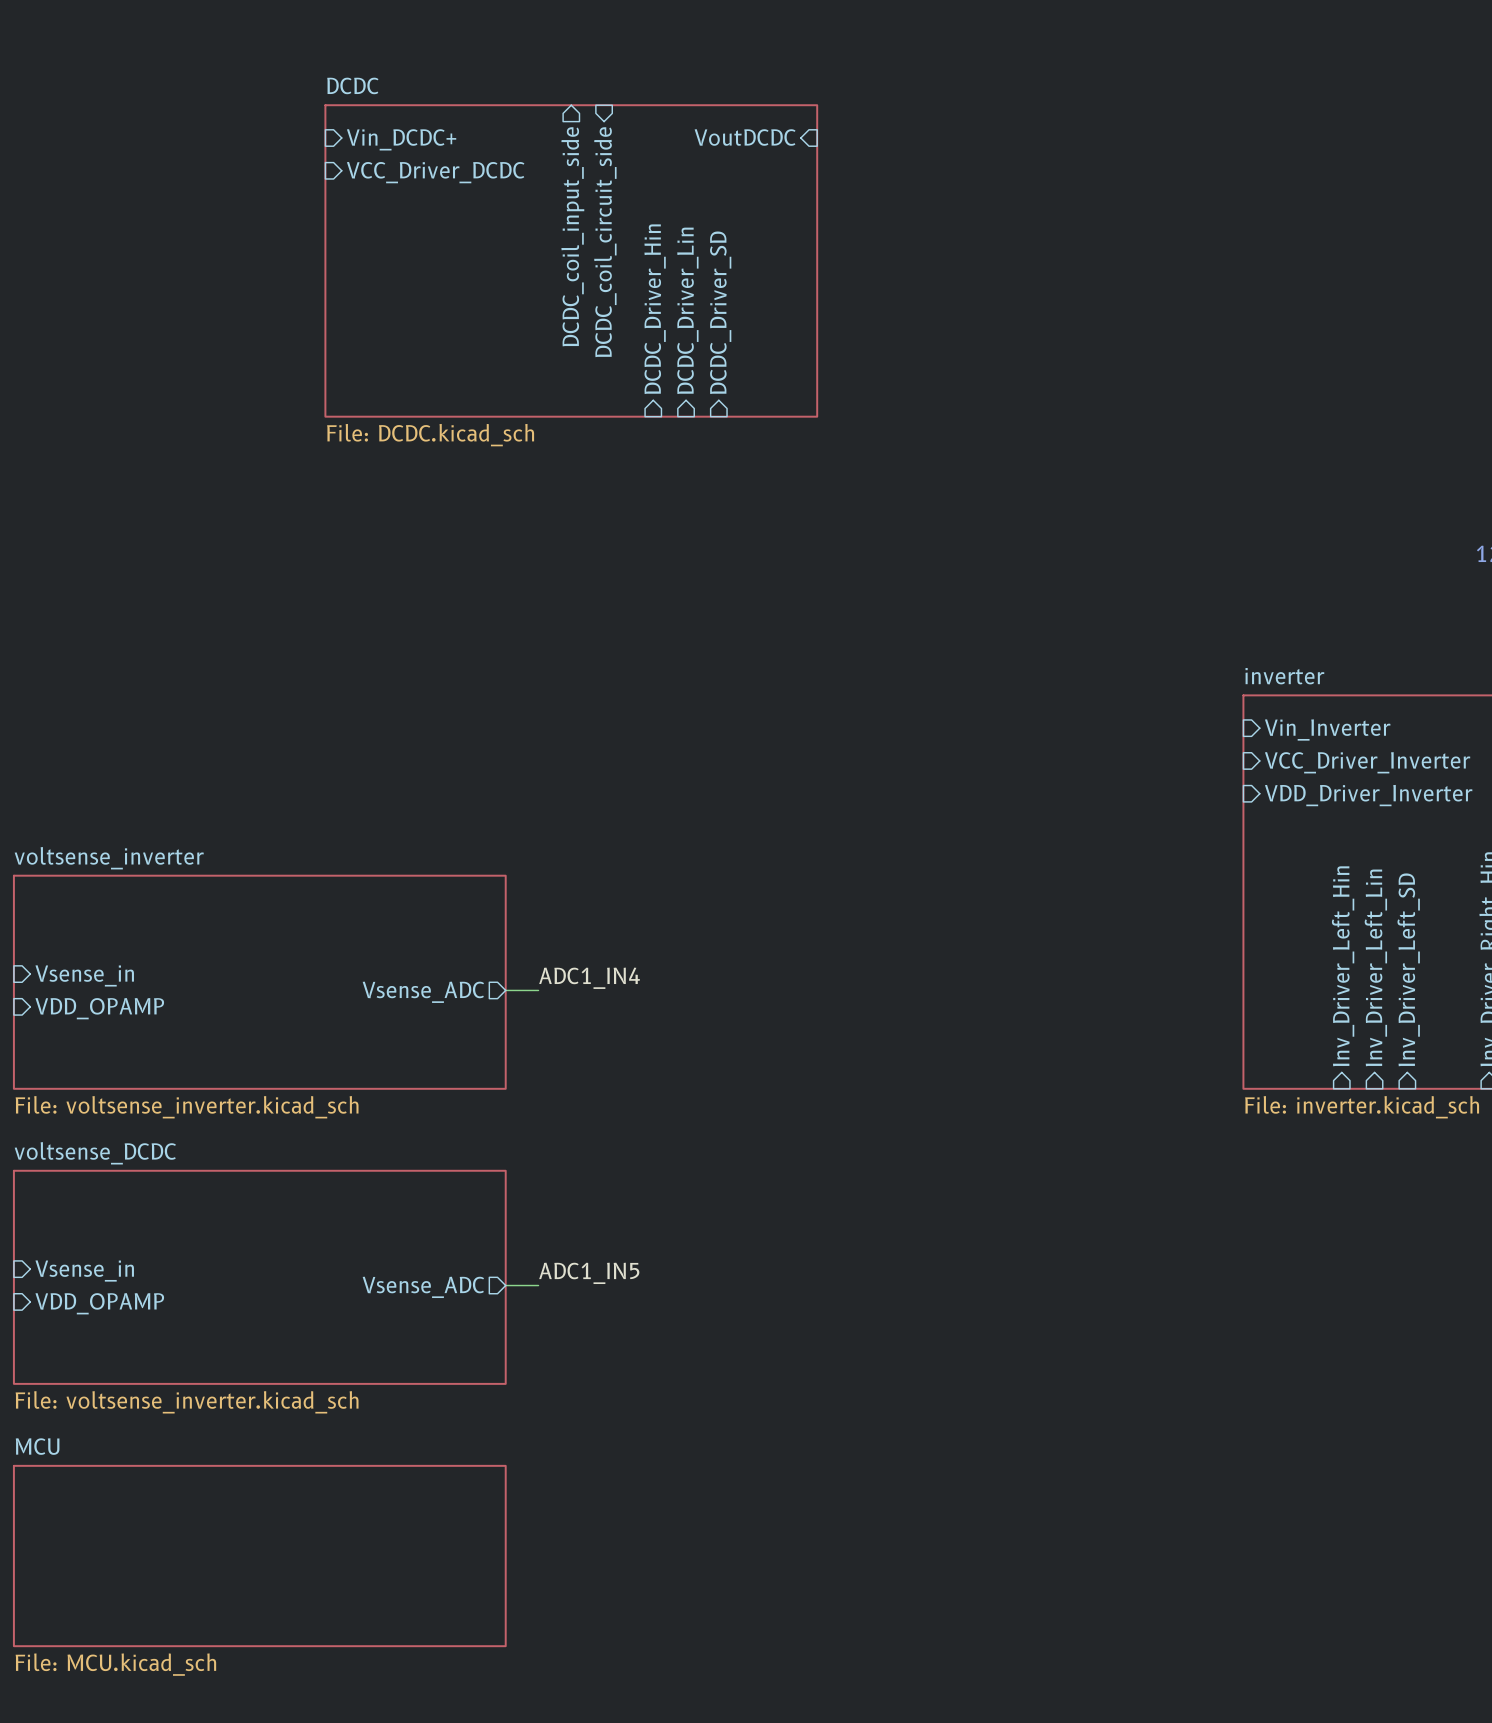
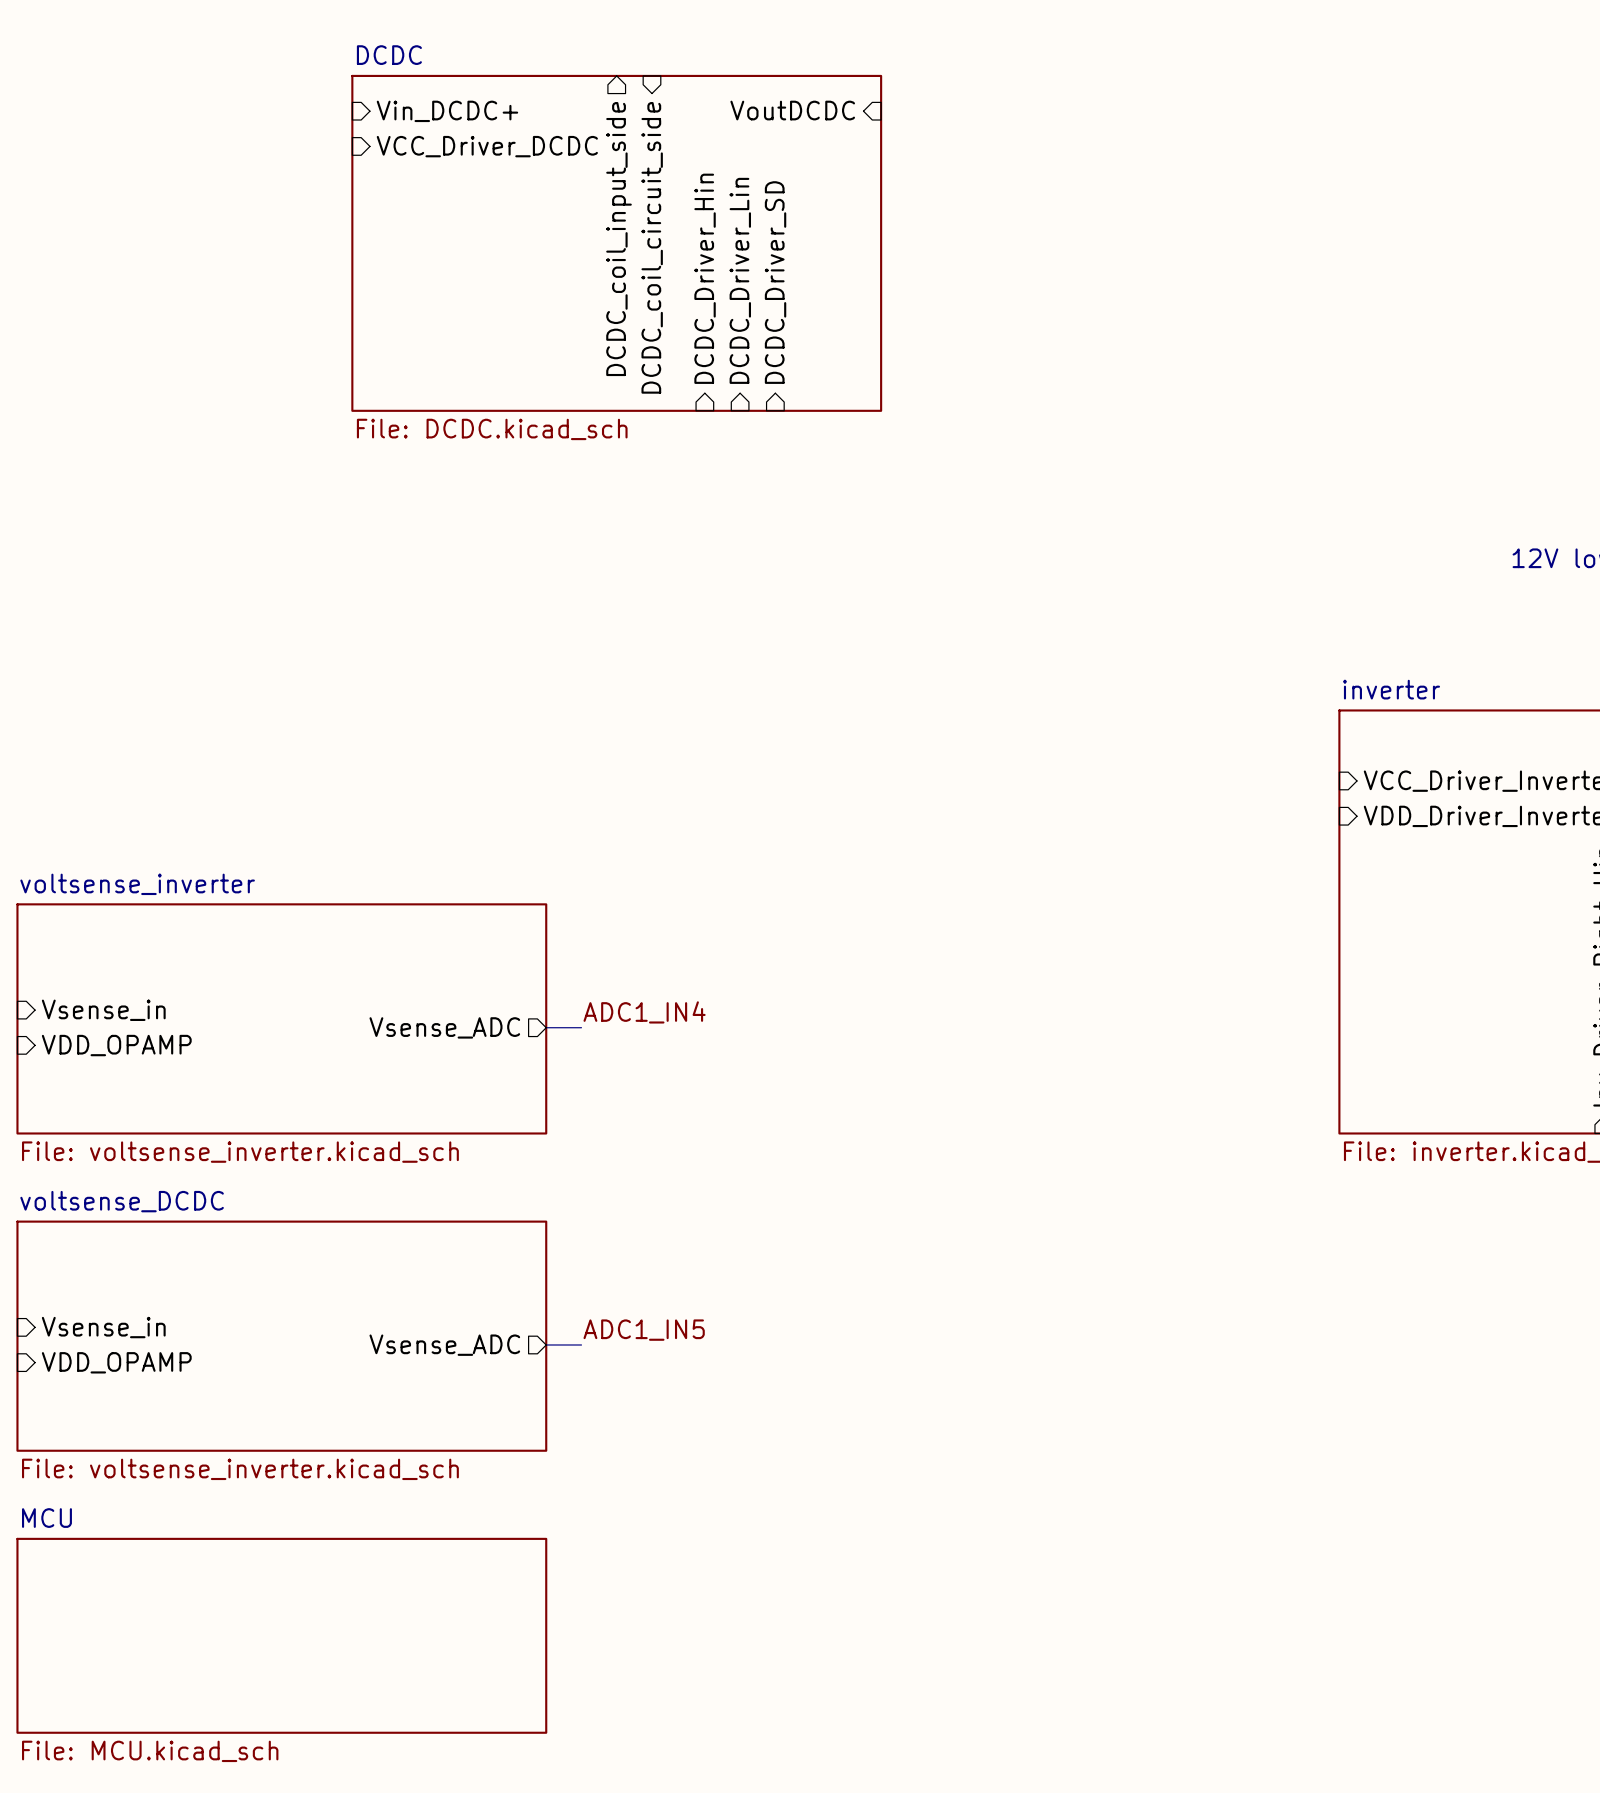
sheet pin: Vin_Inverter (1327, 730) -> none
sheet pin: Inv_Driver_Left_Hin (1343, 966) -> none
sheet pin: Inv_Driver_Left_Lin (1375, 967) -> none
sheet pin: Inv_Driver_Left_SD (1408, 969) -> none

